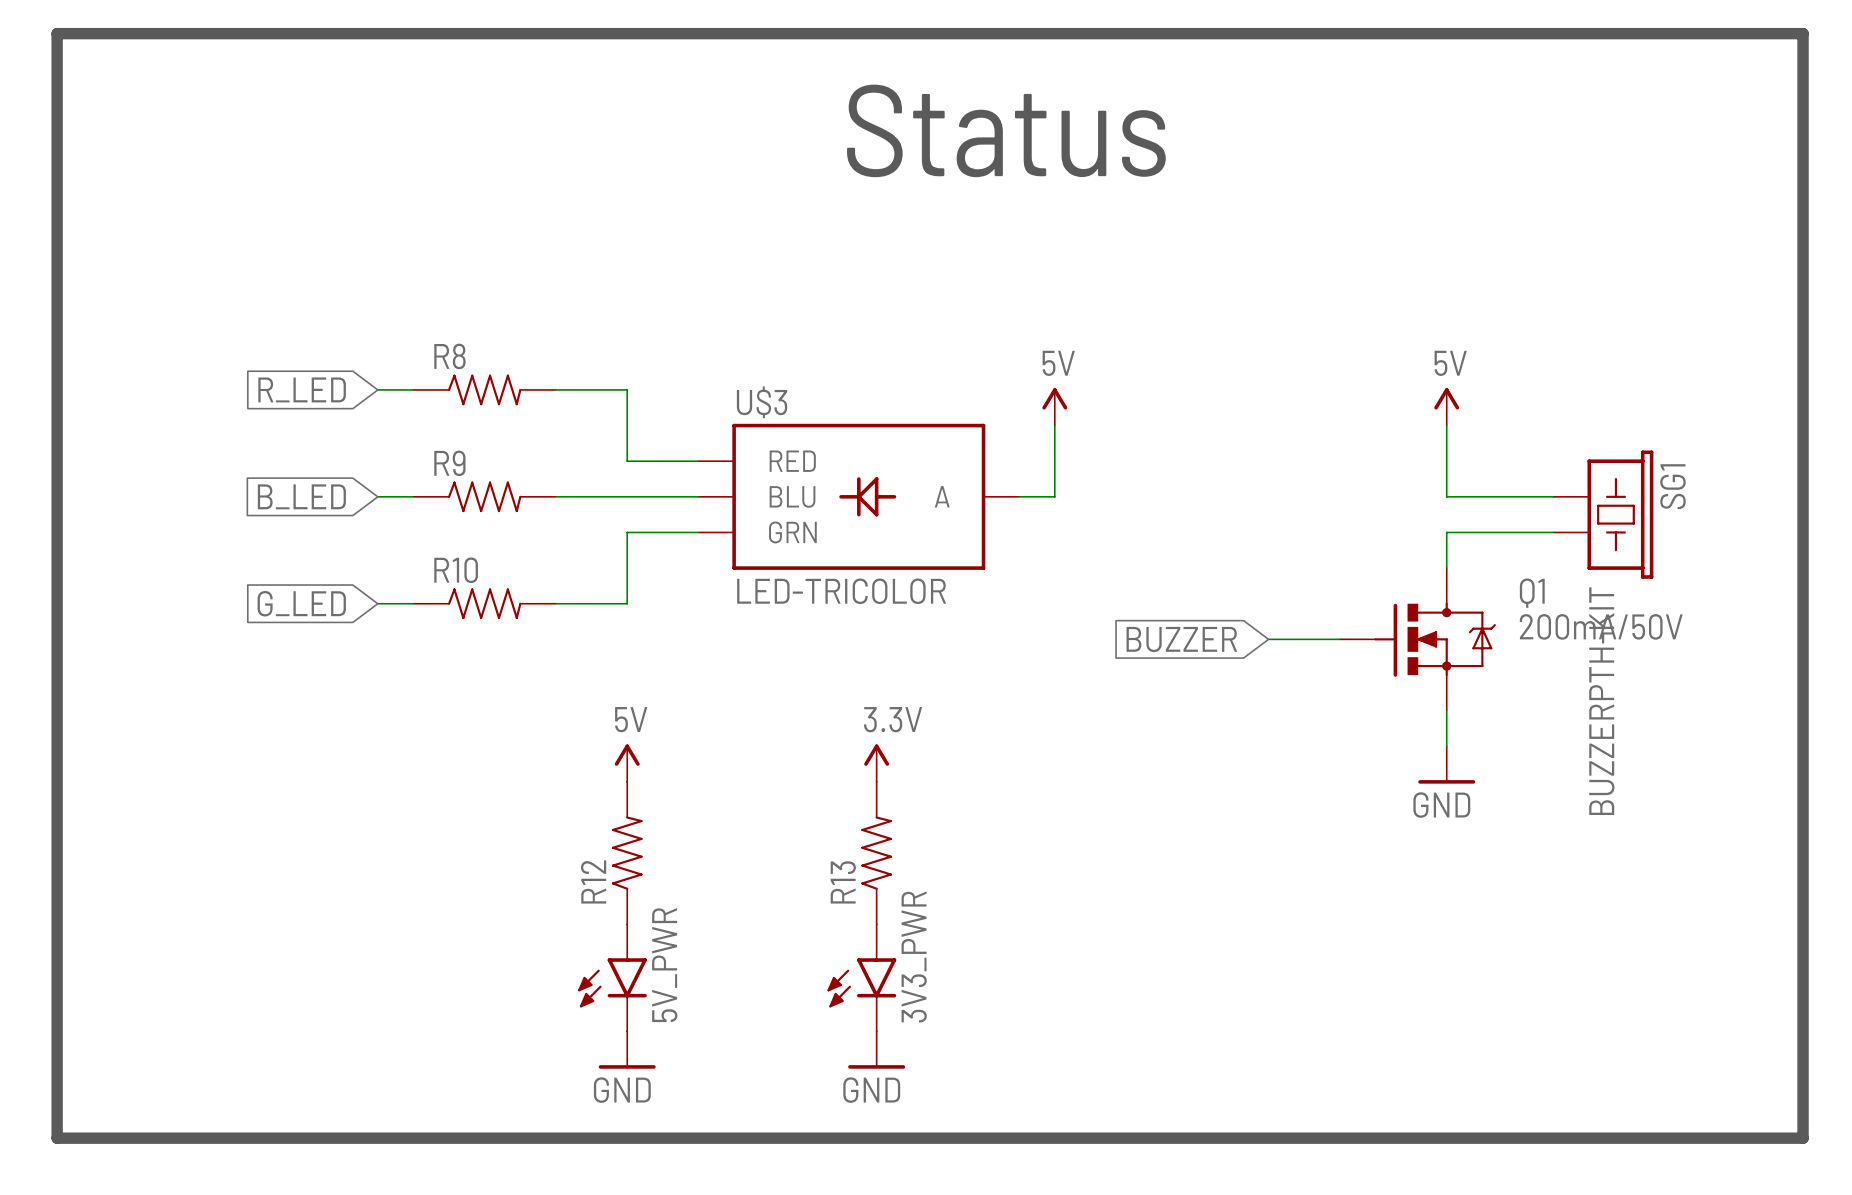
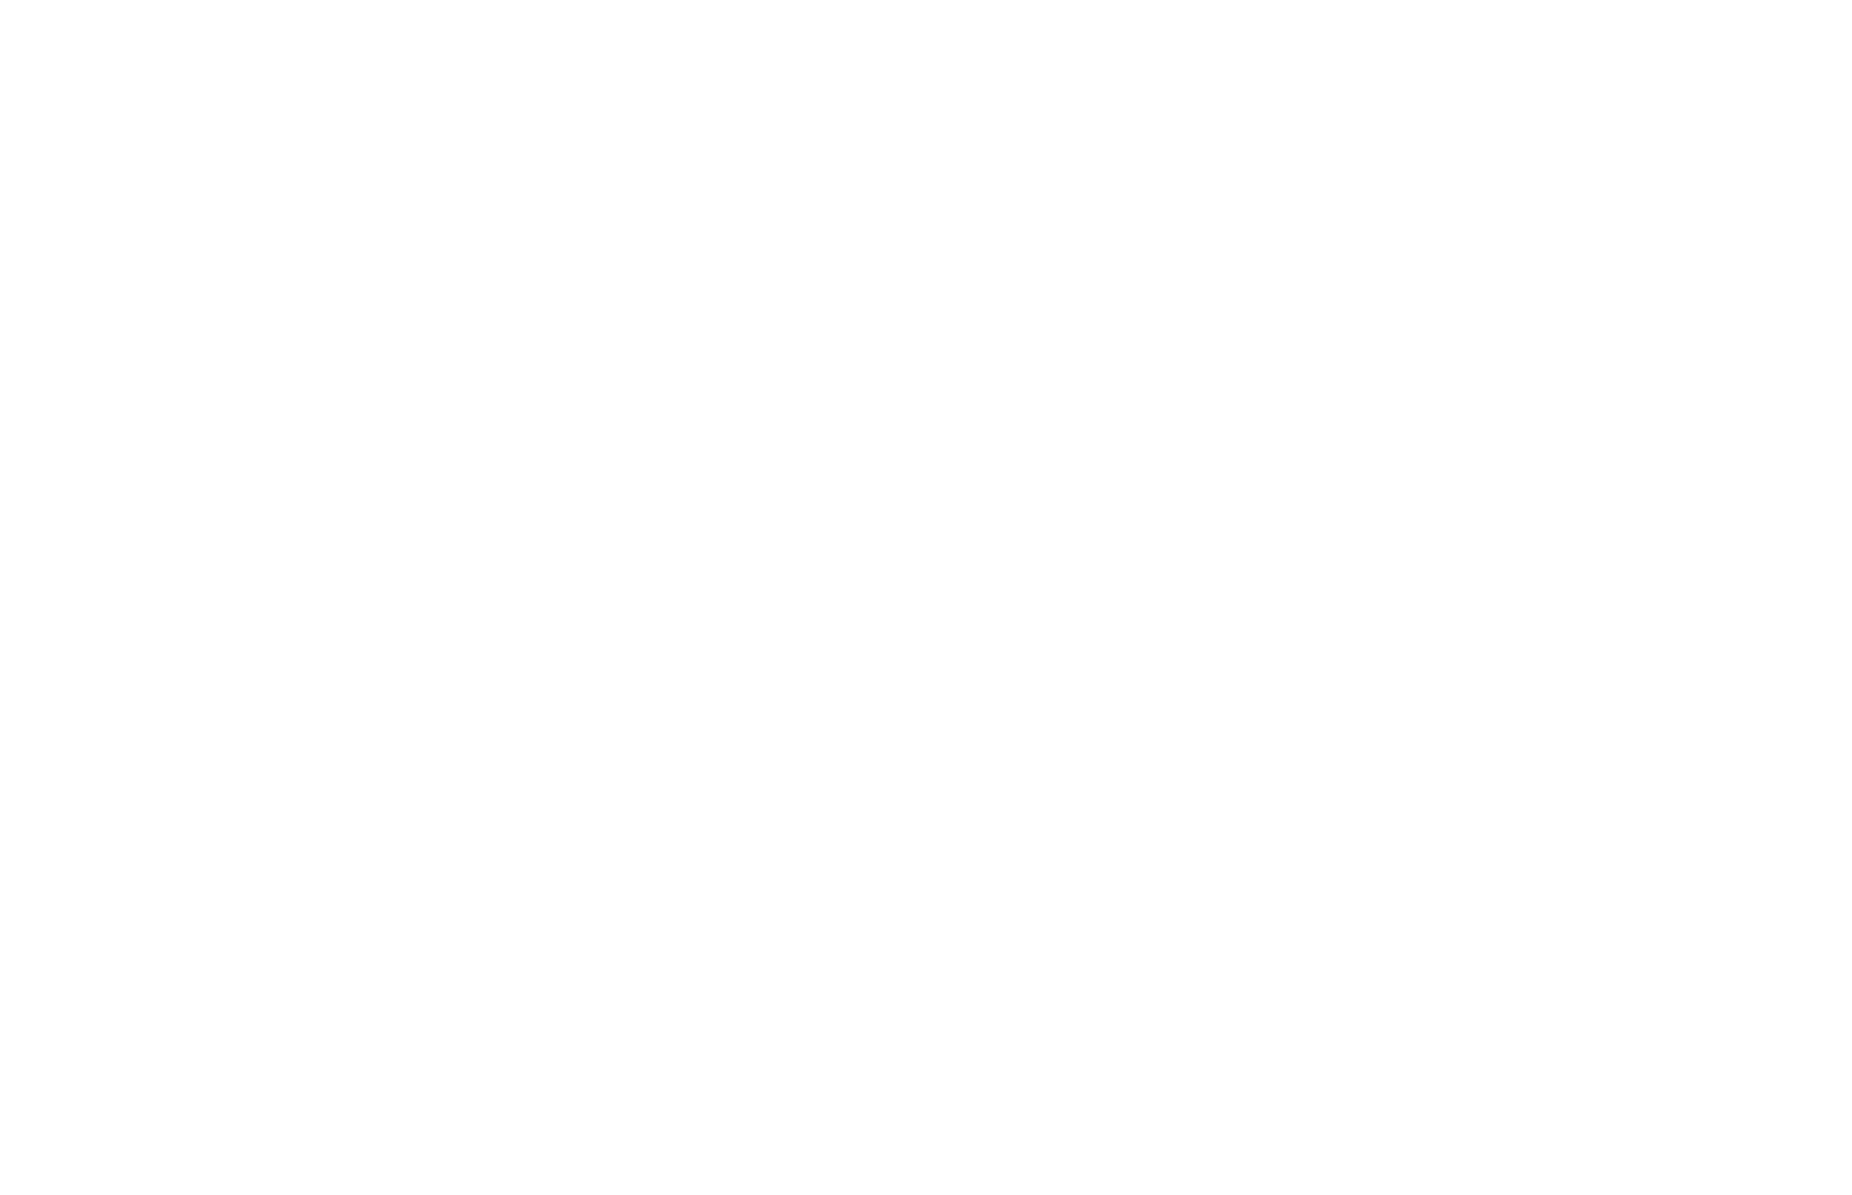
line: (57, 33) (1803, 33) (1803, 1138) (57, 1138) (57, 33) -> none
text: Status (1006, 130) -> none
global label: R_LED (302, 389) -> none
wire: (377, 389) (413, 389) -> none
R8: (484, 389) -> none
wire: (555, 389) (627, 389) (627, 461) (698, 461) -> none
power symbol: 5V (1054, 406) -> none
power symbol: 5V (1446, 406) -> none
wire: (1054, 425) (1054, 496) (1019, 496) -> none
wire: (1446, 425) (1446, 496) (1553, 496) -> none
global label: B_LED (301, 496) -> none
wire: (377, 496) (413, 496) -> none
R9: (484, 496) -> none
wire: (555, 496) (698, 496) -> none
U$3: LED-TRICOLOR (858, 496) -> none
SG1: BUZZERPTH-KIT (1603, 514) -> none
wire: (698, 532) (627, 532) (627, 603) (555, 603) -> none
wire: (1553, 532) (1446, 532) (1446, 568) -> none
global label: G_LED (301, 603) -> none
wire: (377, 603) (413, 603) -> none
R10: (484, 603) -> none
global label: BUZZER (1181, 639) -> none
wire: (1268, 639) (1339, 639) -> none
Q1: 200mA/50V (1417, 639) -> none
wire: (1446, 710) (1446, 746) -> none
power symbol: 5V (627, 763) -> none
power symbol: 3.3V (876, 763) -> none
power symbol: GND (1446, 764) -> none
R12: (627, 853) -> none
R13: (876, 853) -> none
5V_PWR: (612, 977) -> none
3V3_PWR: (861, 977) -> none
power symbol: GND (627, 1050) -> none
power symbol: GND (876, 1050) -> none

